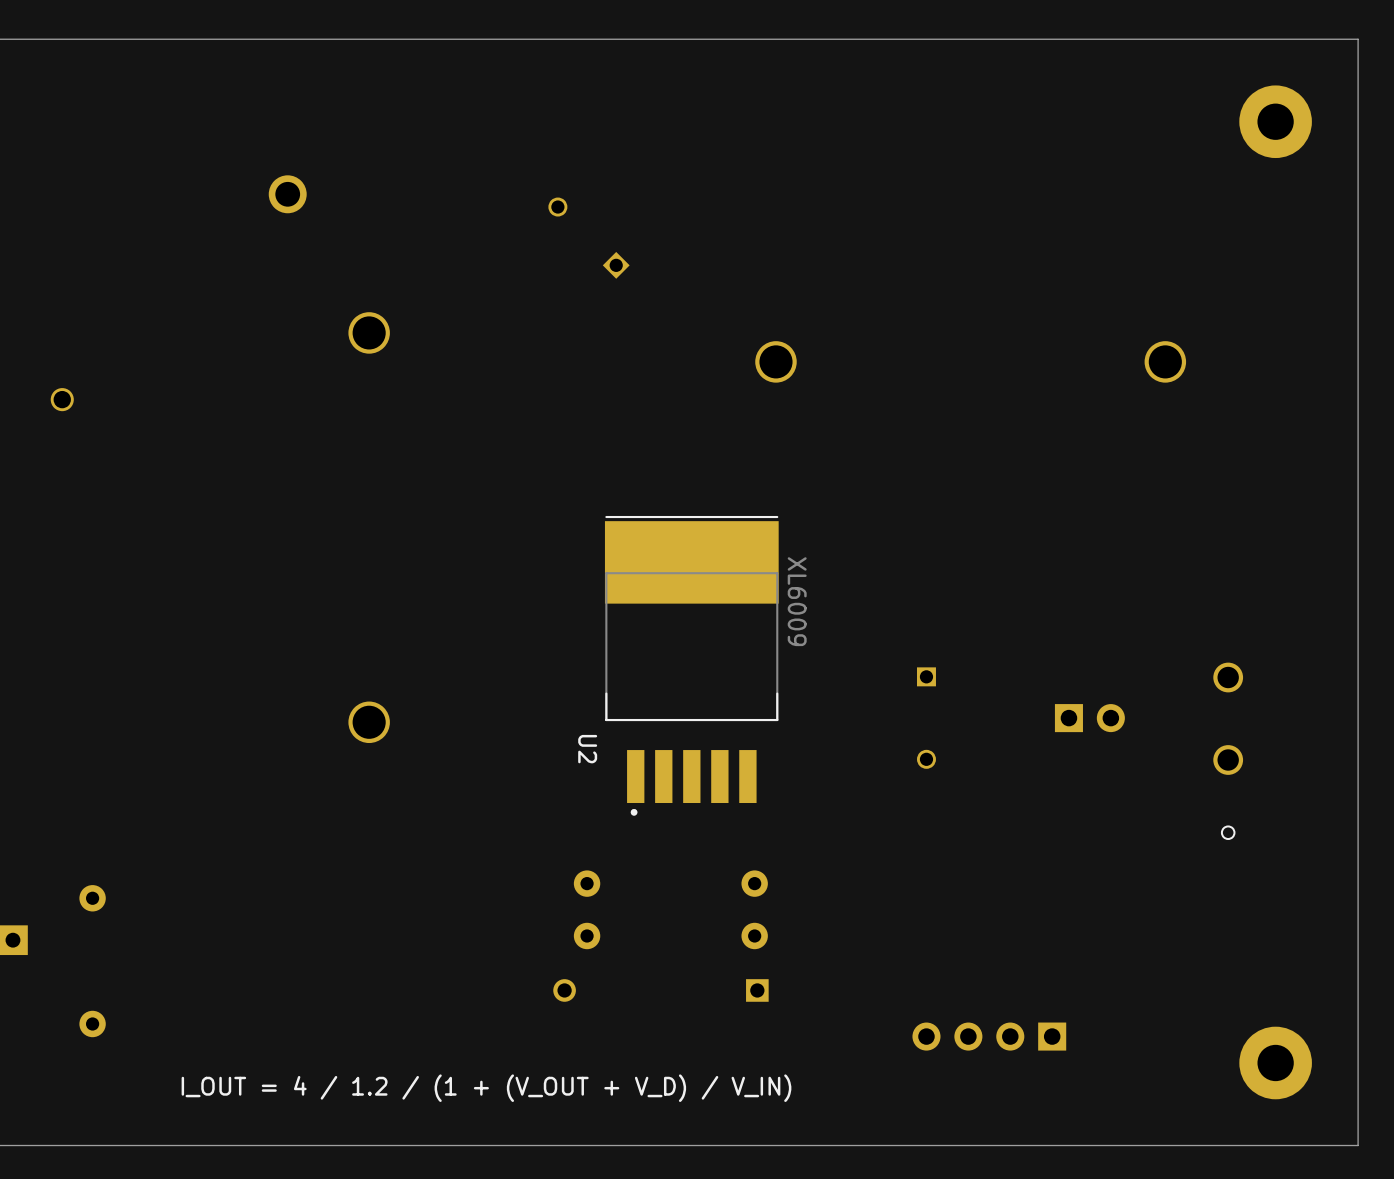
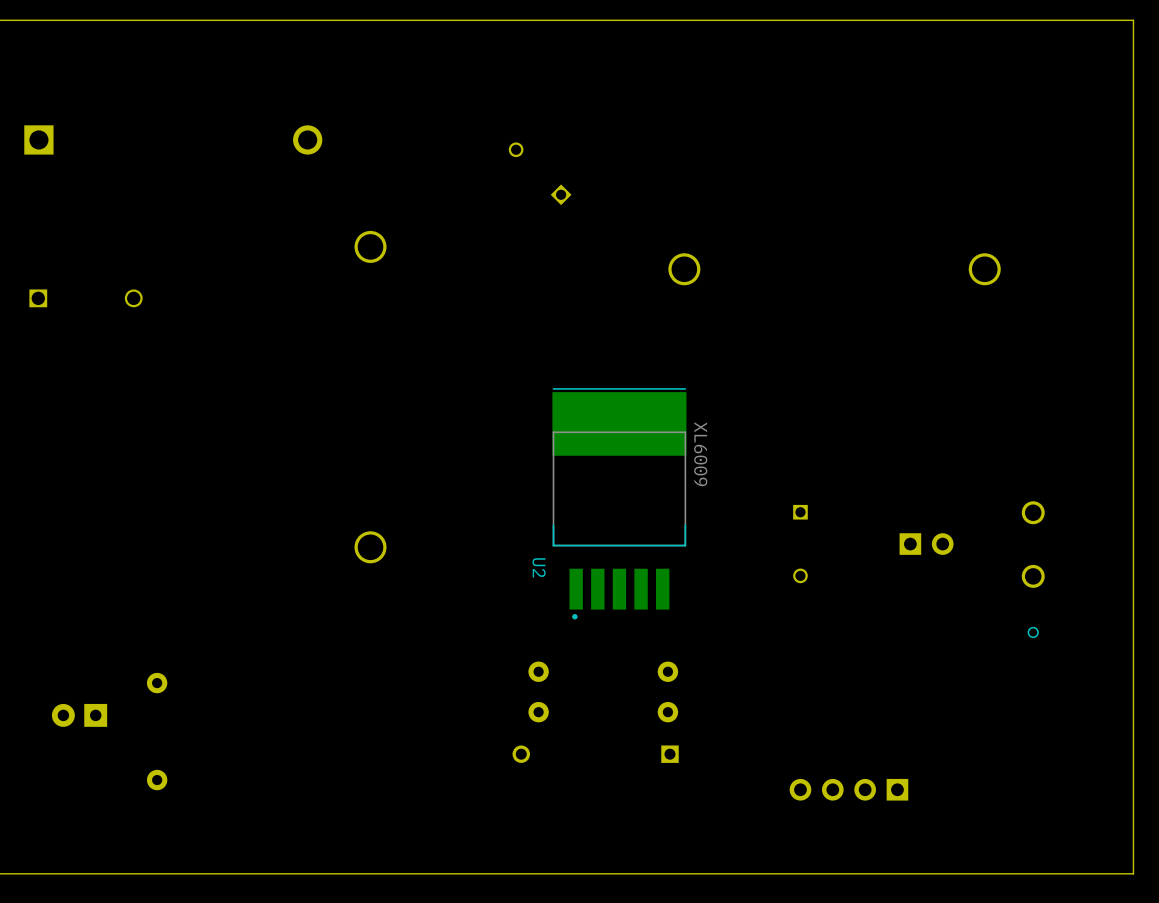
part: (1275, 121) -> none
part: (1275, 1062) -> none
text: I_OUT = 4 / 1.2 / (1 + (V_OUT + V_D) / V_IN) (486, 1088) -> none

